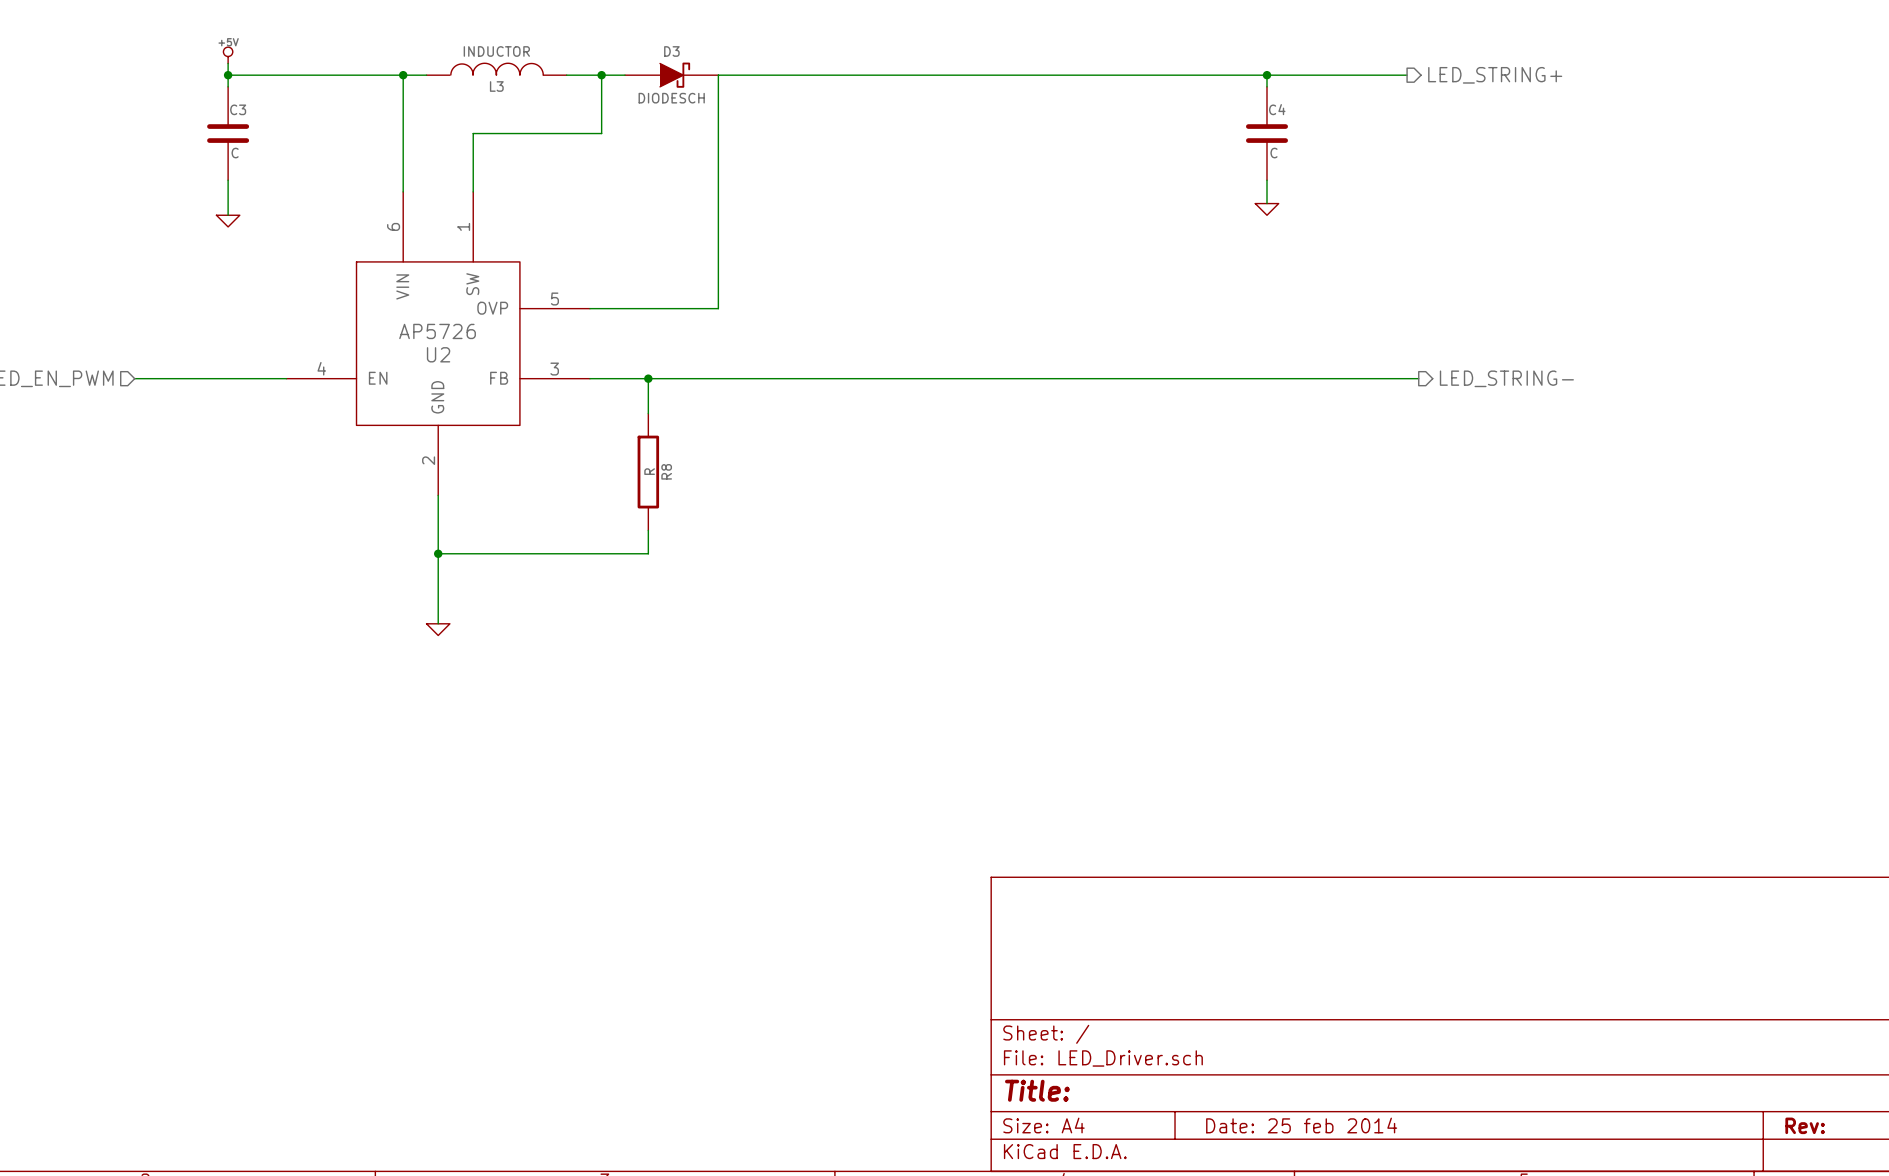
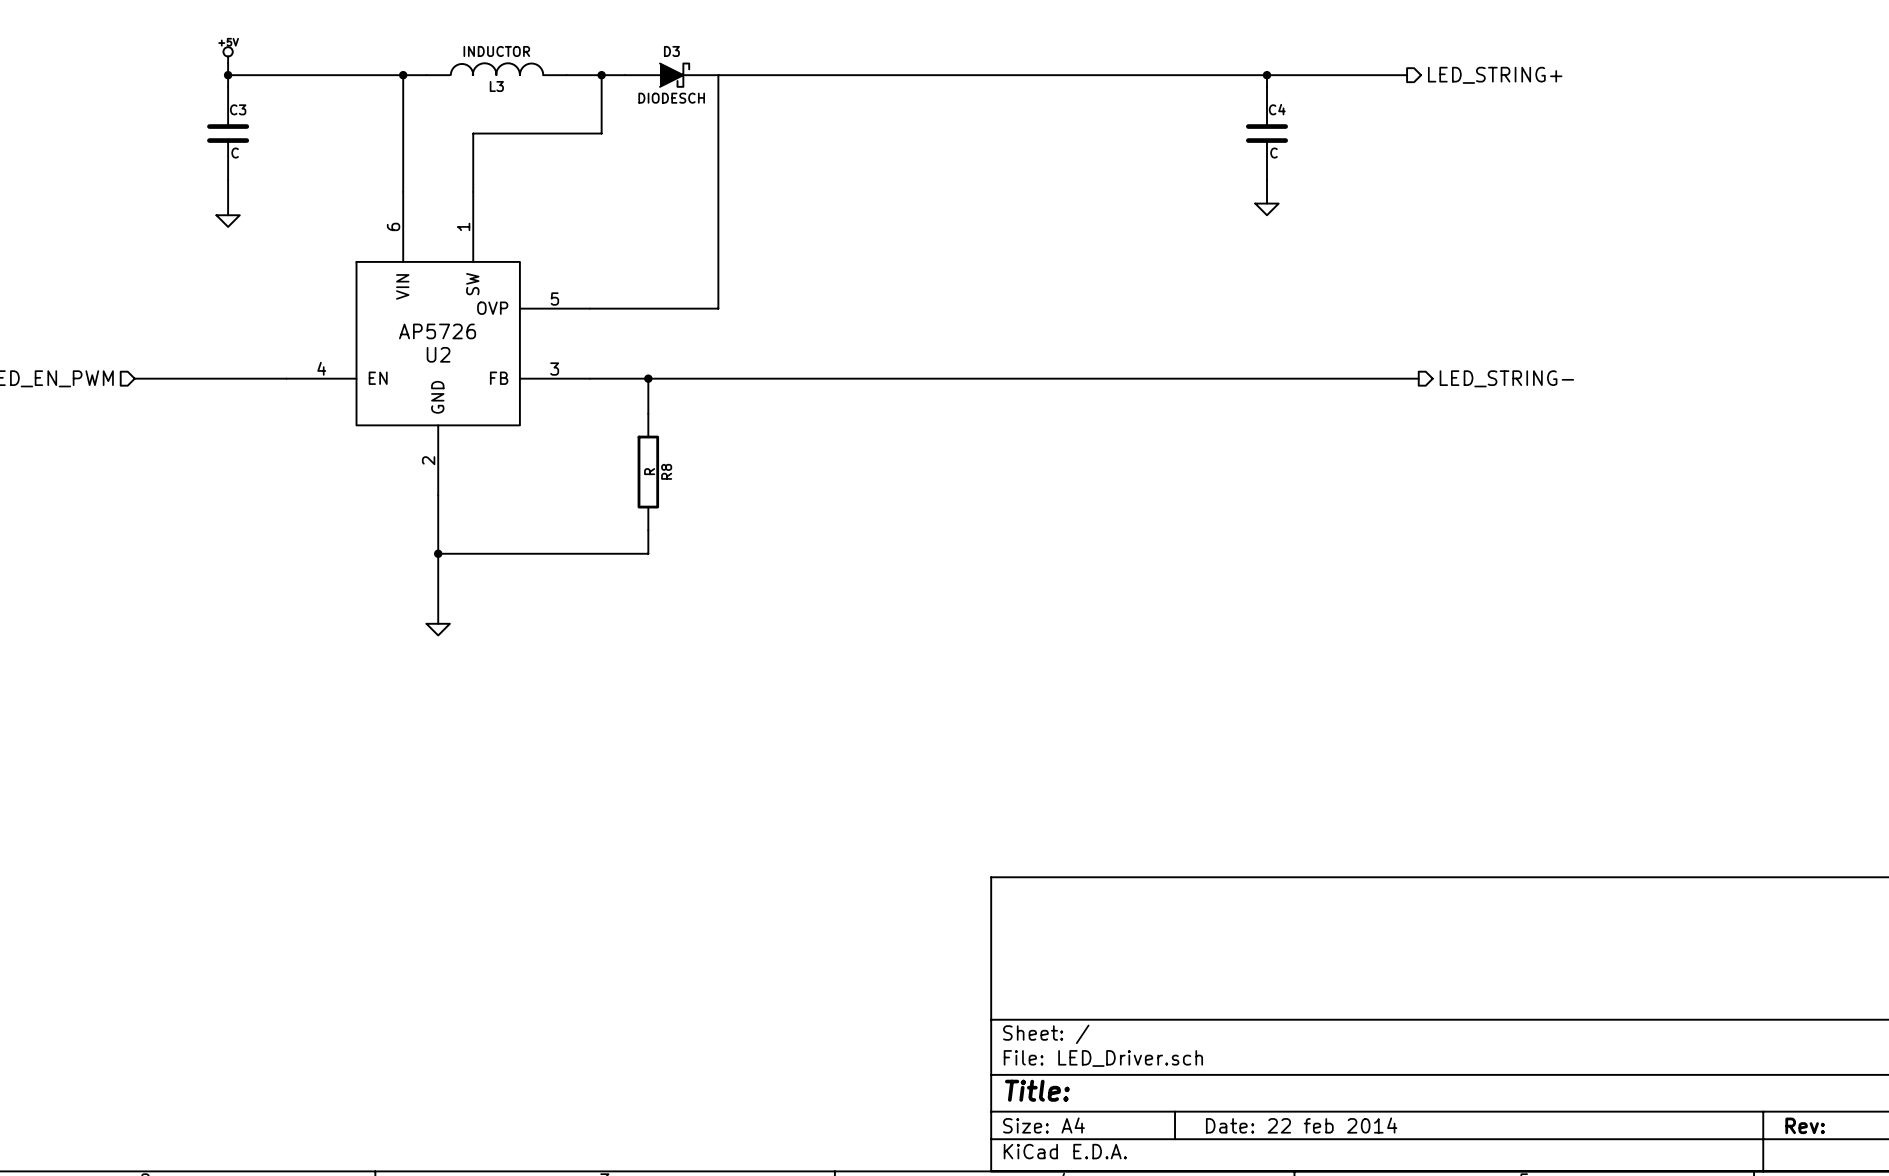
title block: Date: 25 feb 2014 (1301, 1125) -> Date: 22 feb 2014 (1301, 1125)

